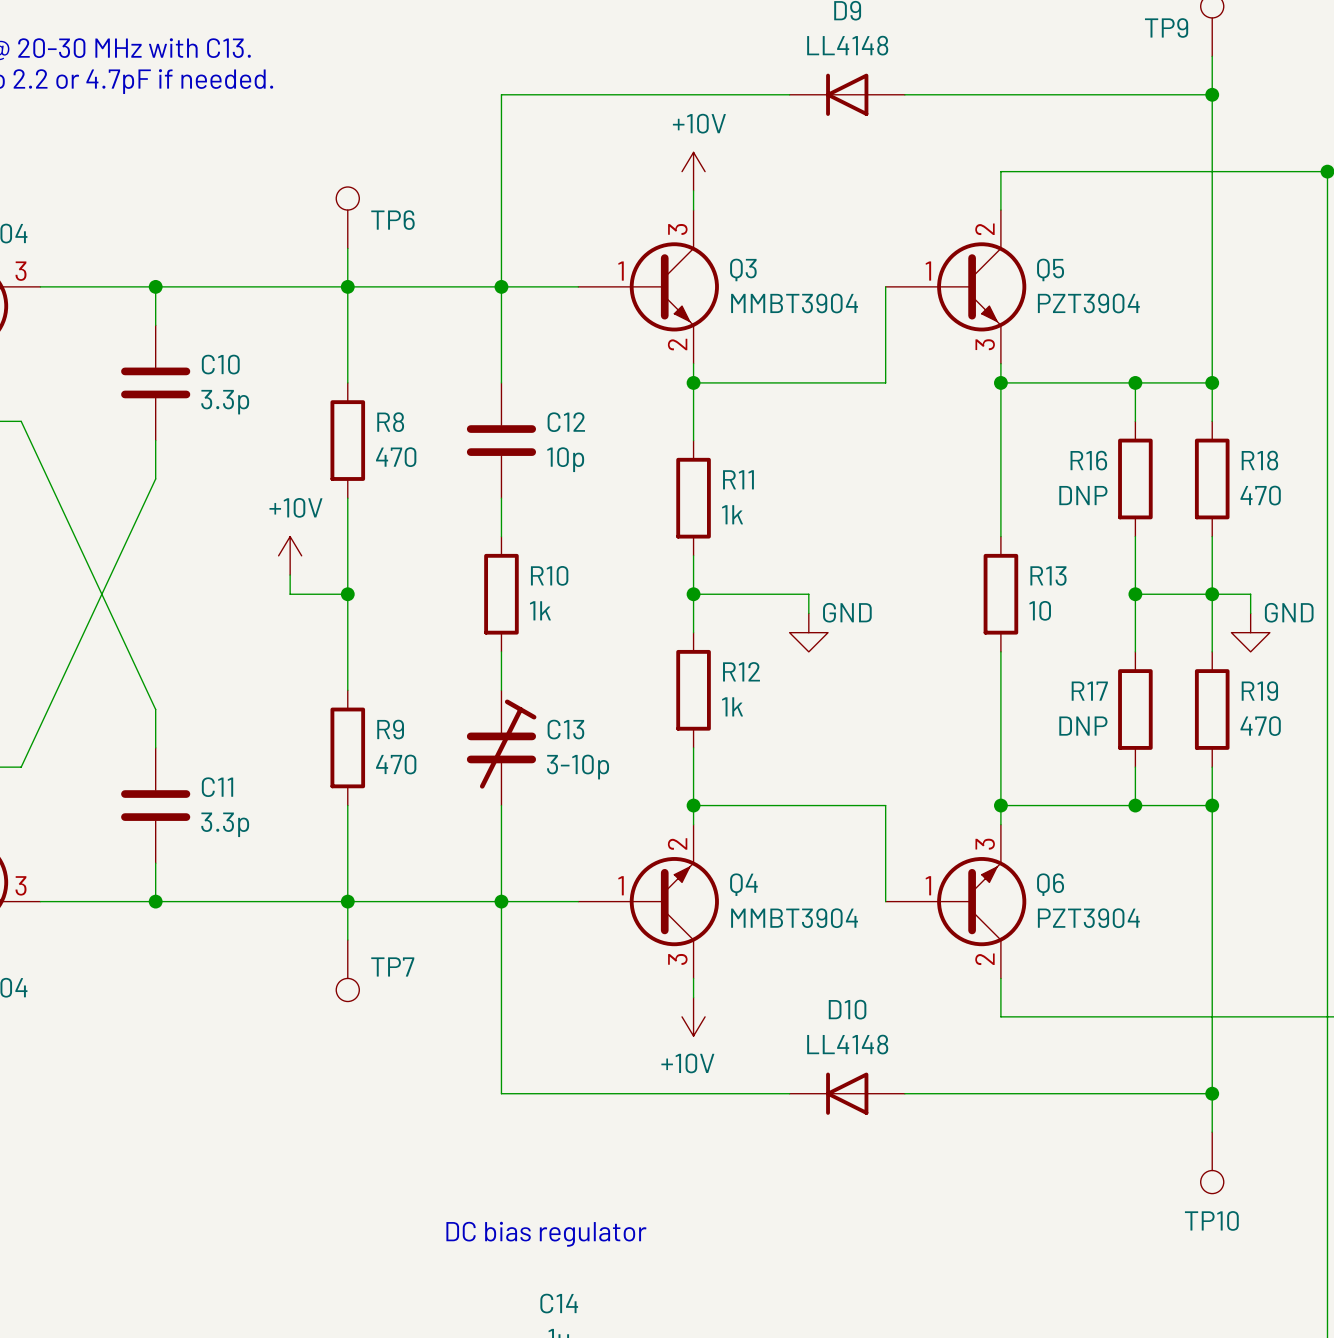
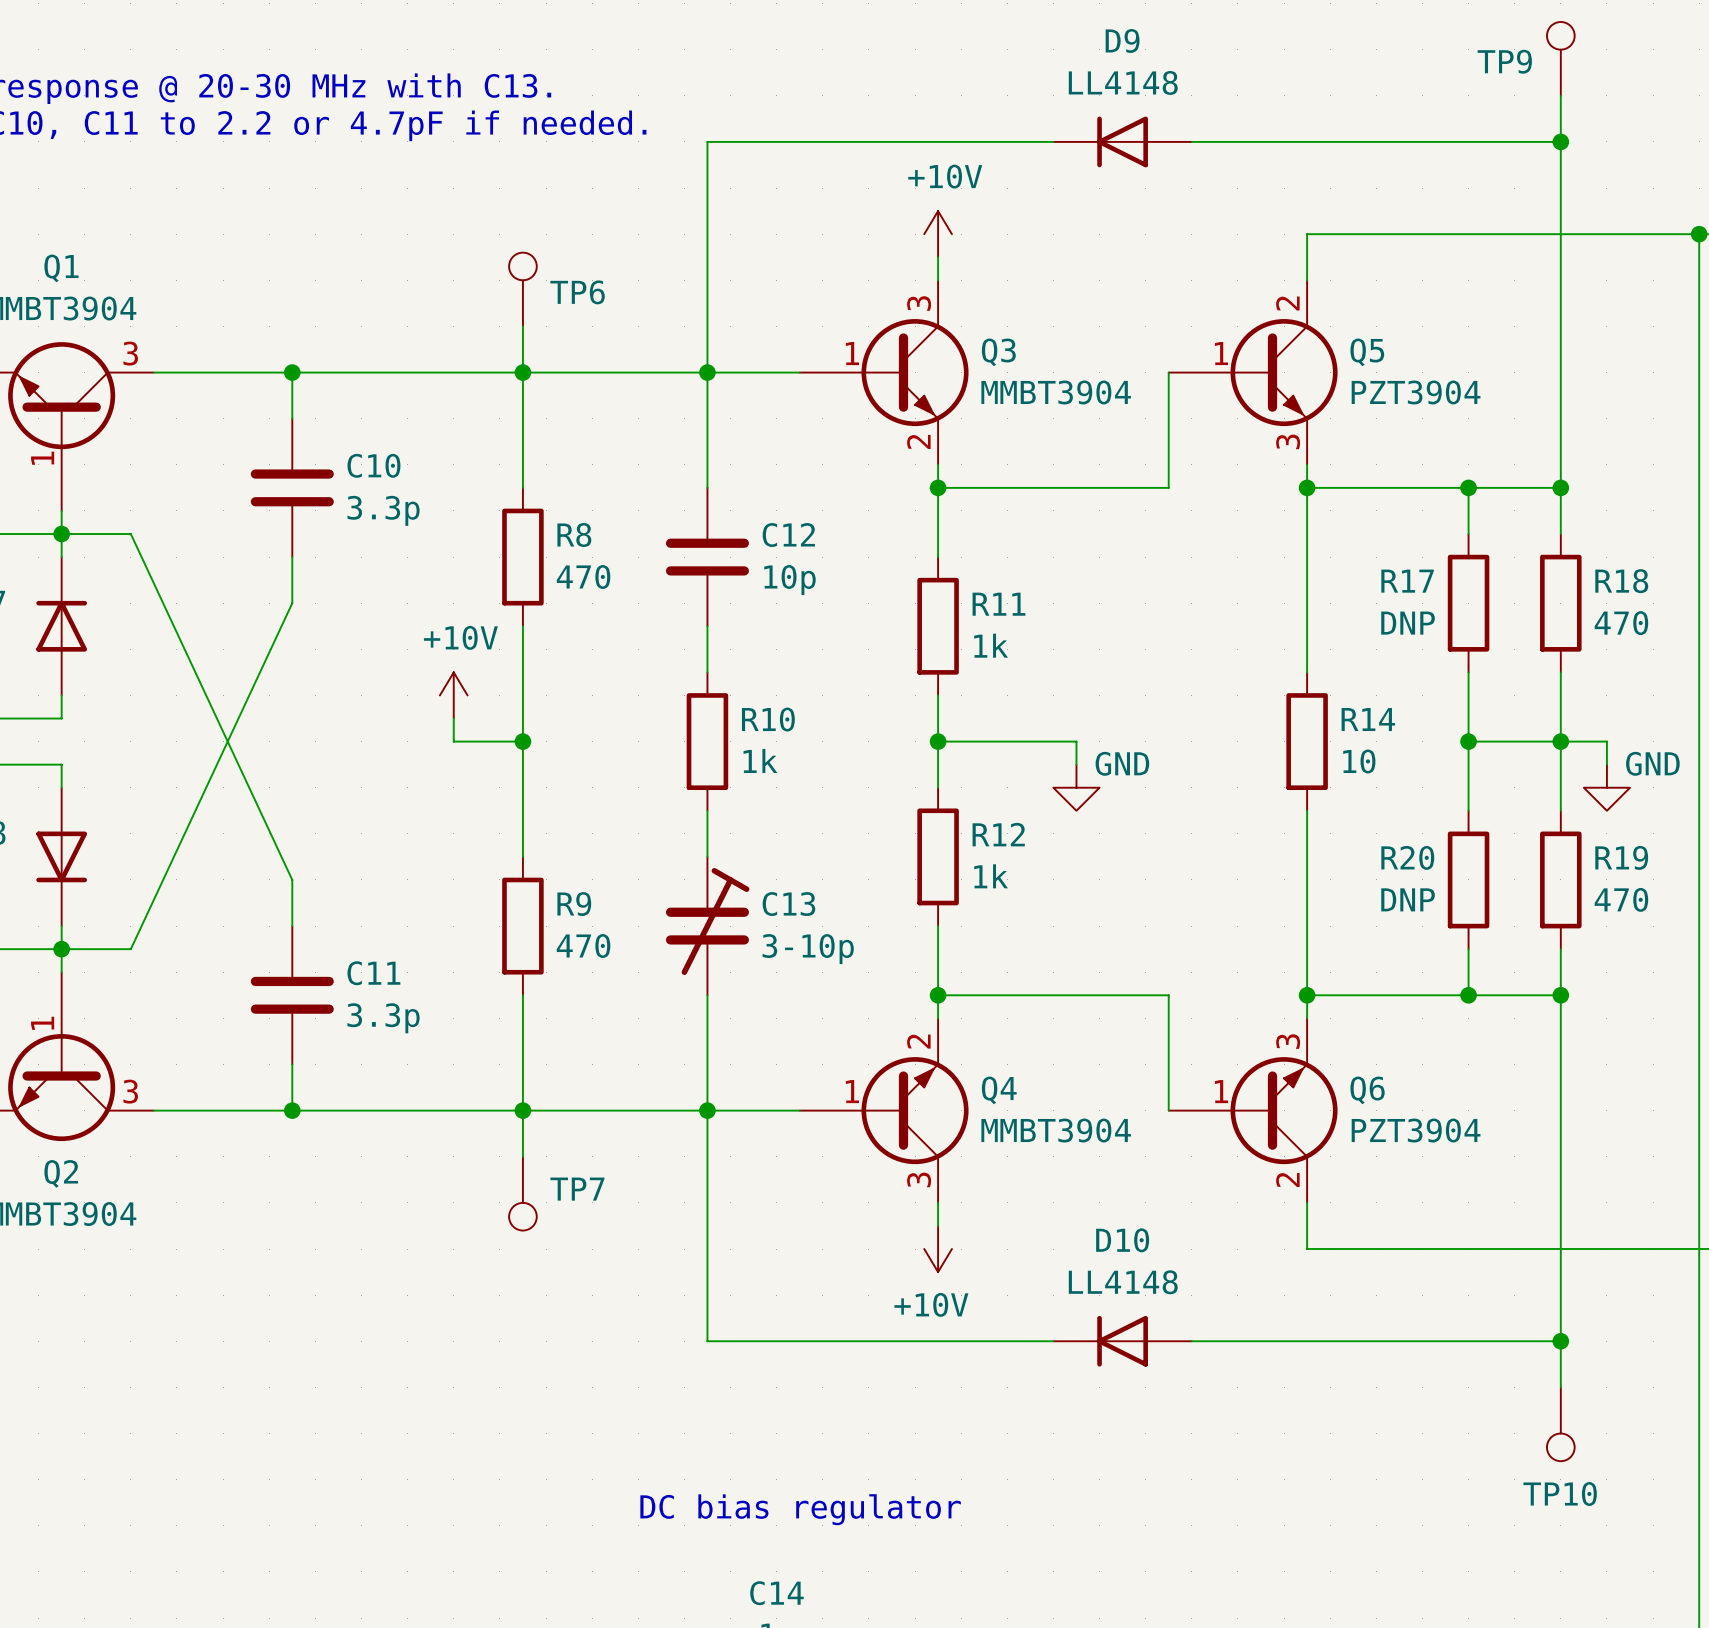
R16 name: R16 (1088, 460) -> R17 (1407, 581)
R13 name: R13 (1048, 575) -> R14 (1368, 719)
R17 name: R17 (1089, 691) -> R20 (1407, 857)

